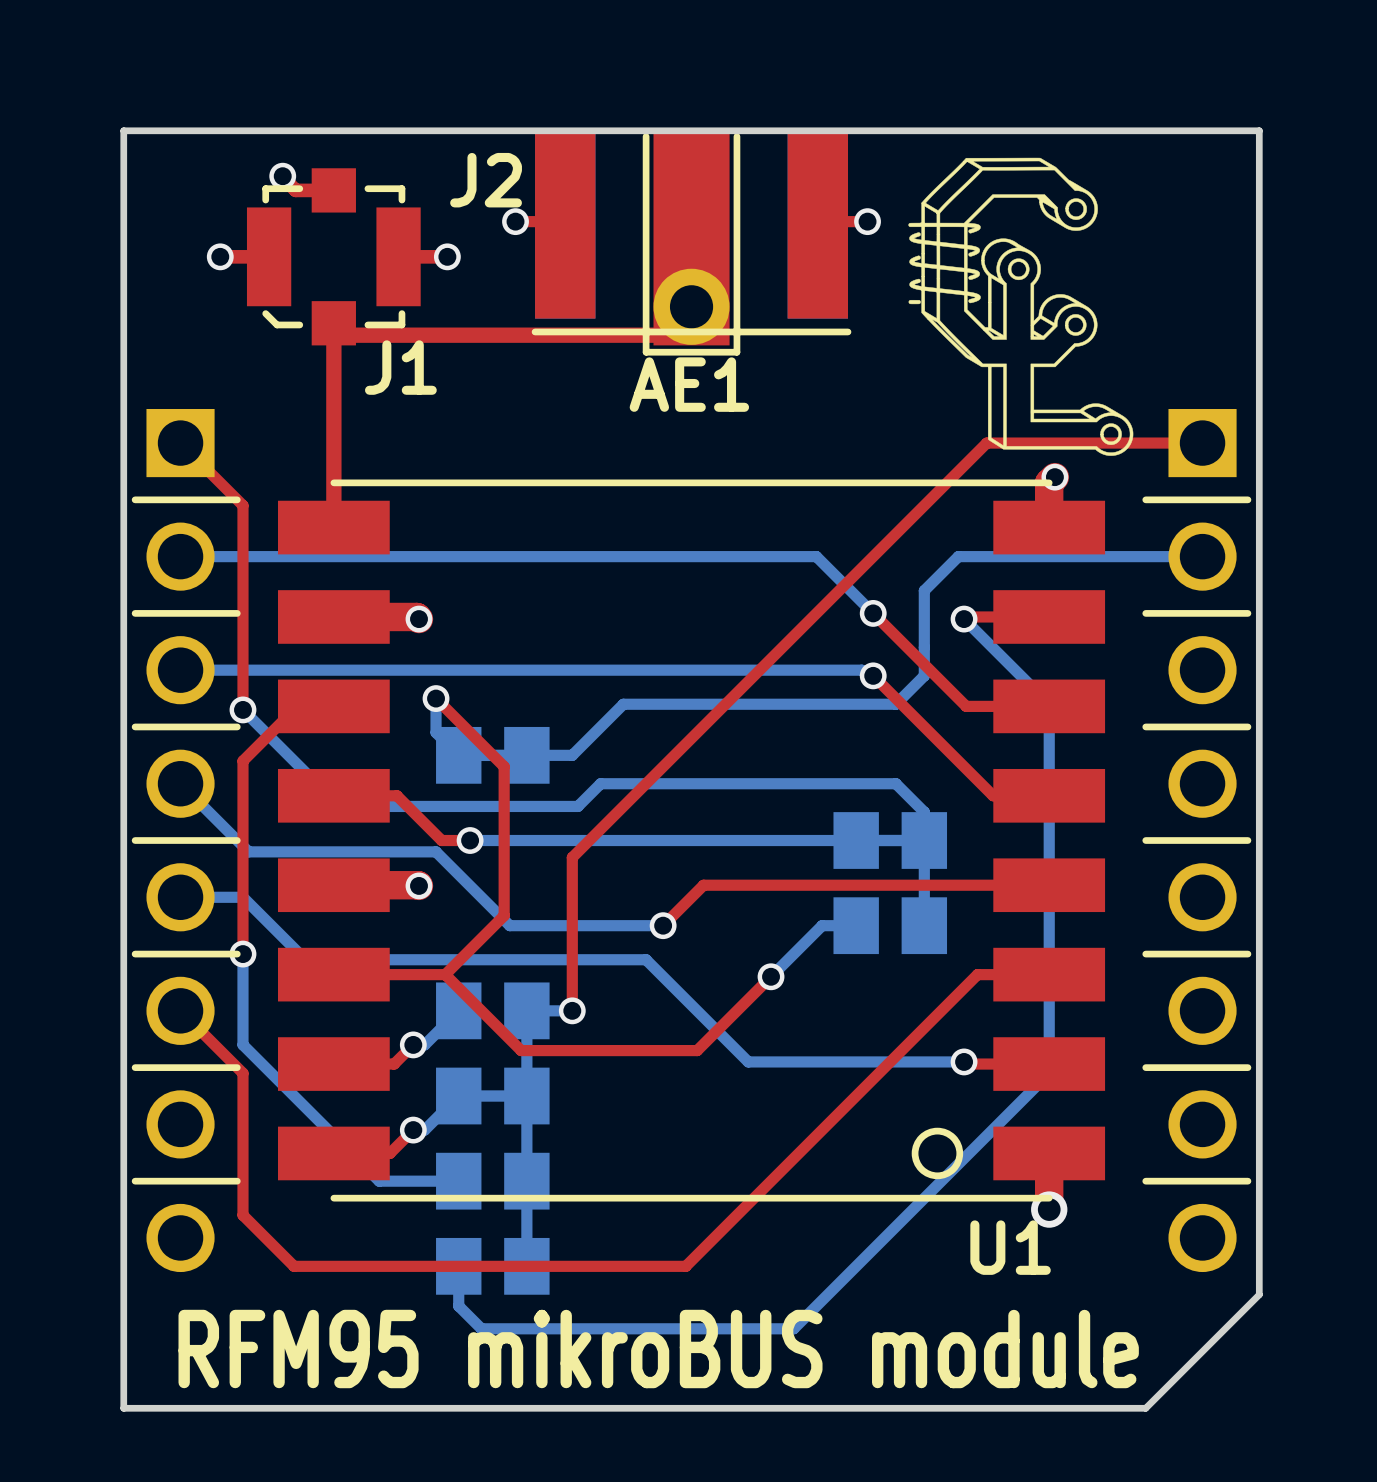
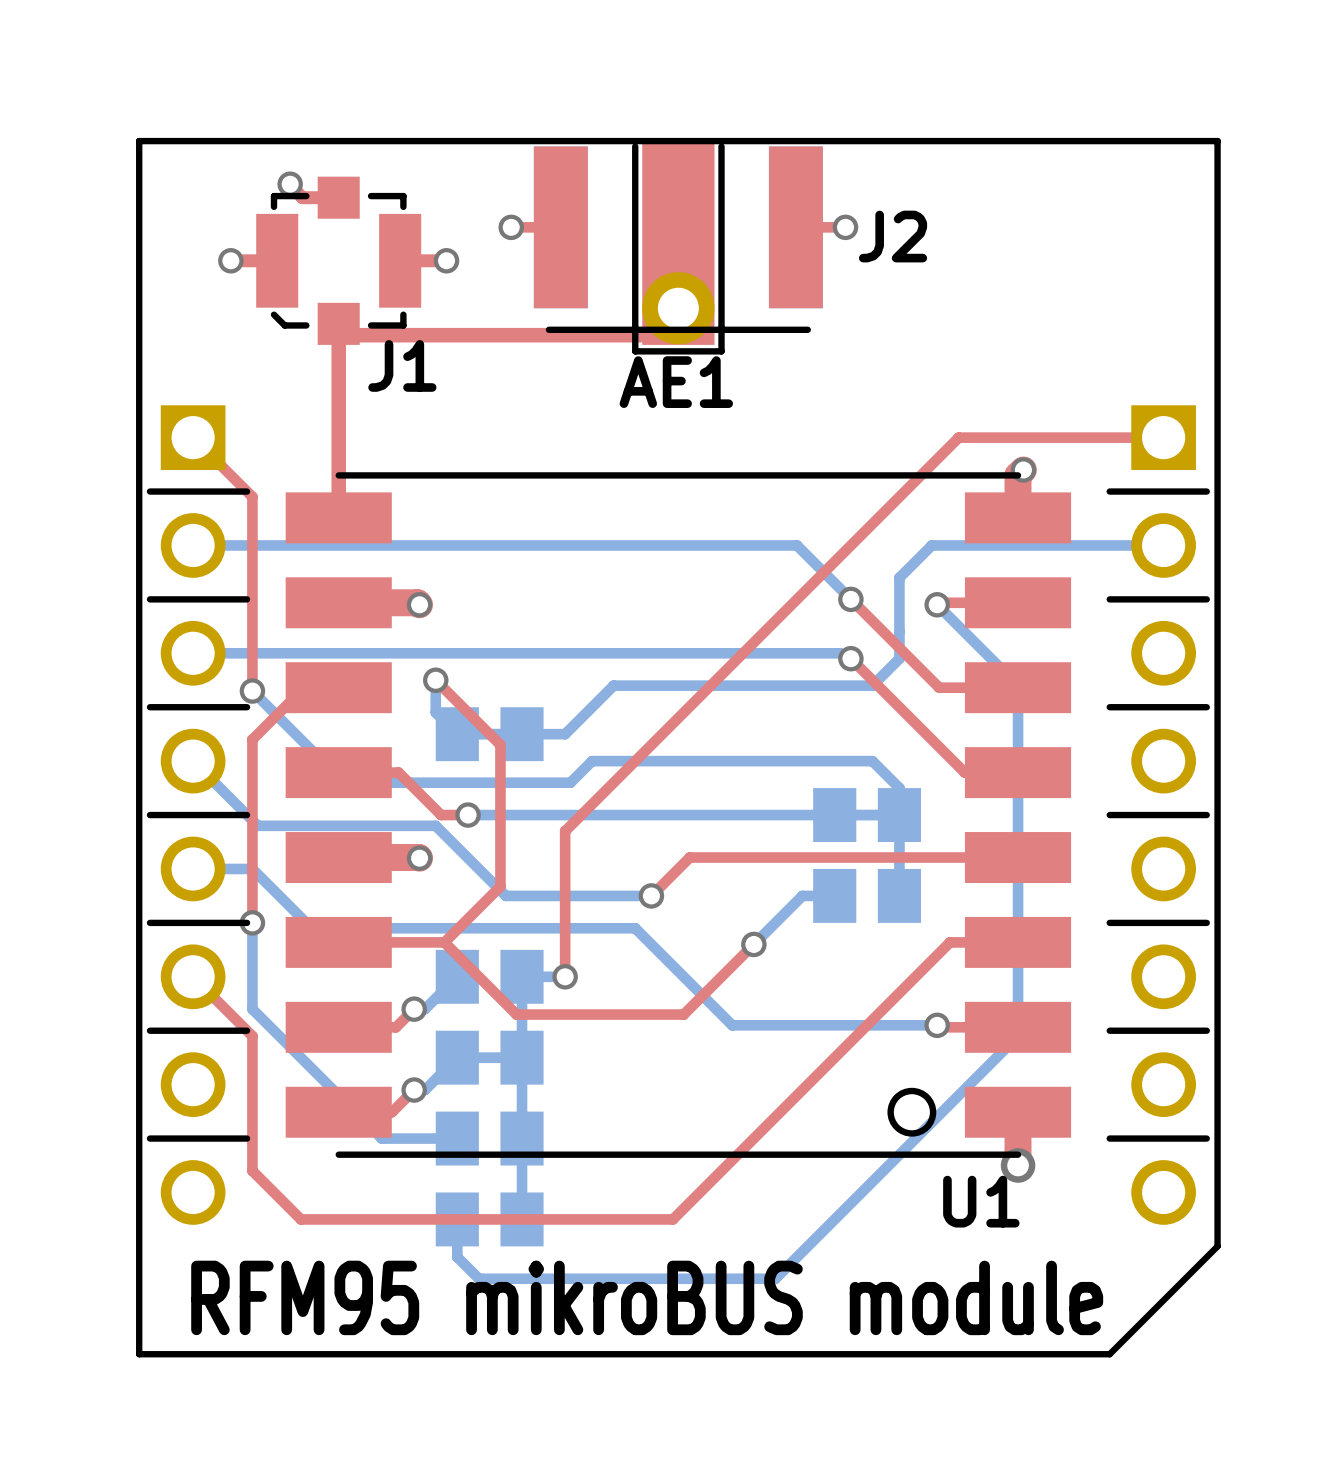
J2 footprint: [531, 130, 852, 336] -> [533, 146, 823, 333]
drawing: [908, 157, 1134, 456] -> none
J2 name position: J2 (486, 180) -> J2 (893, 236)

